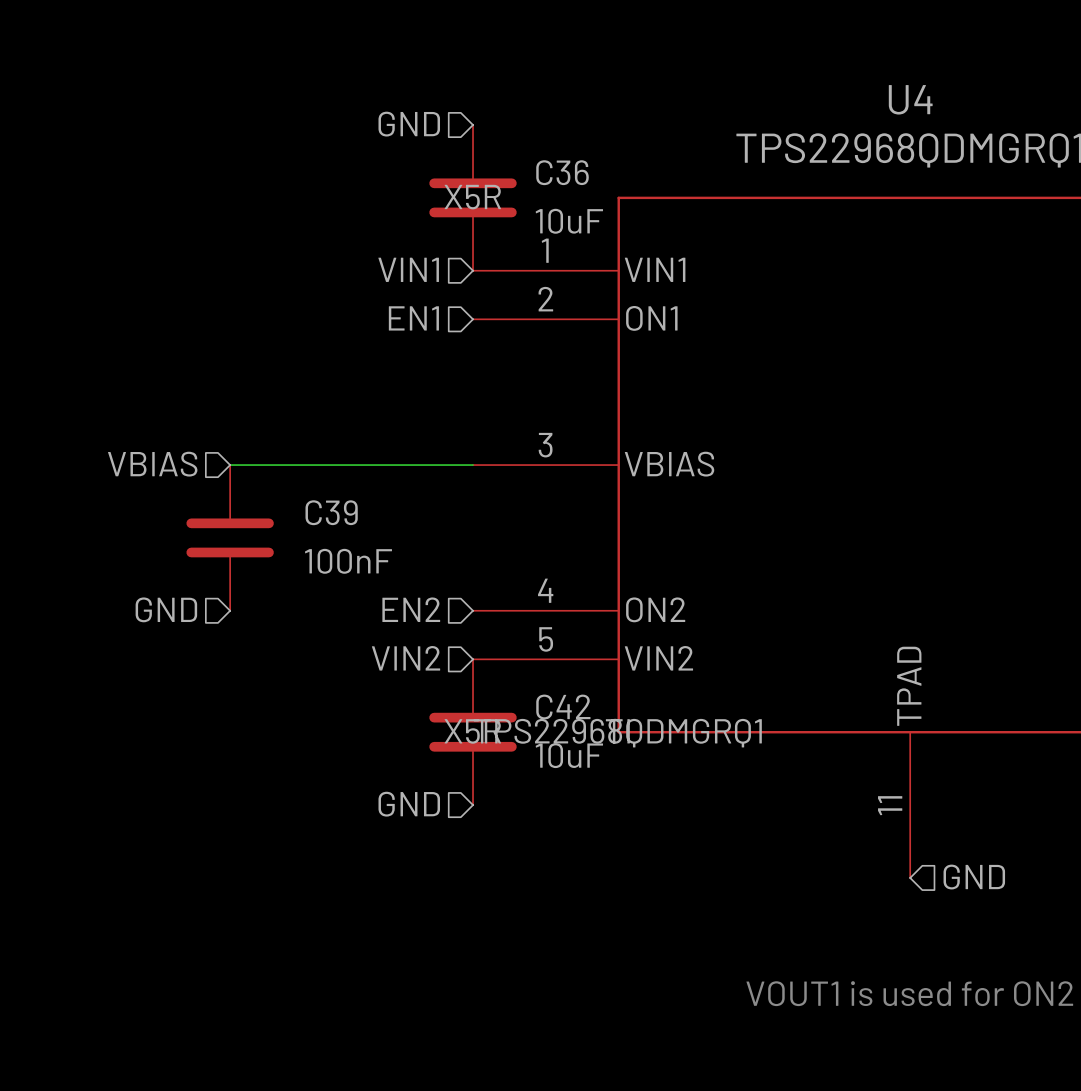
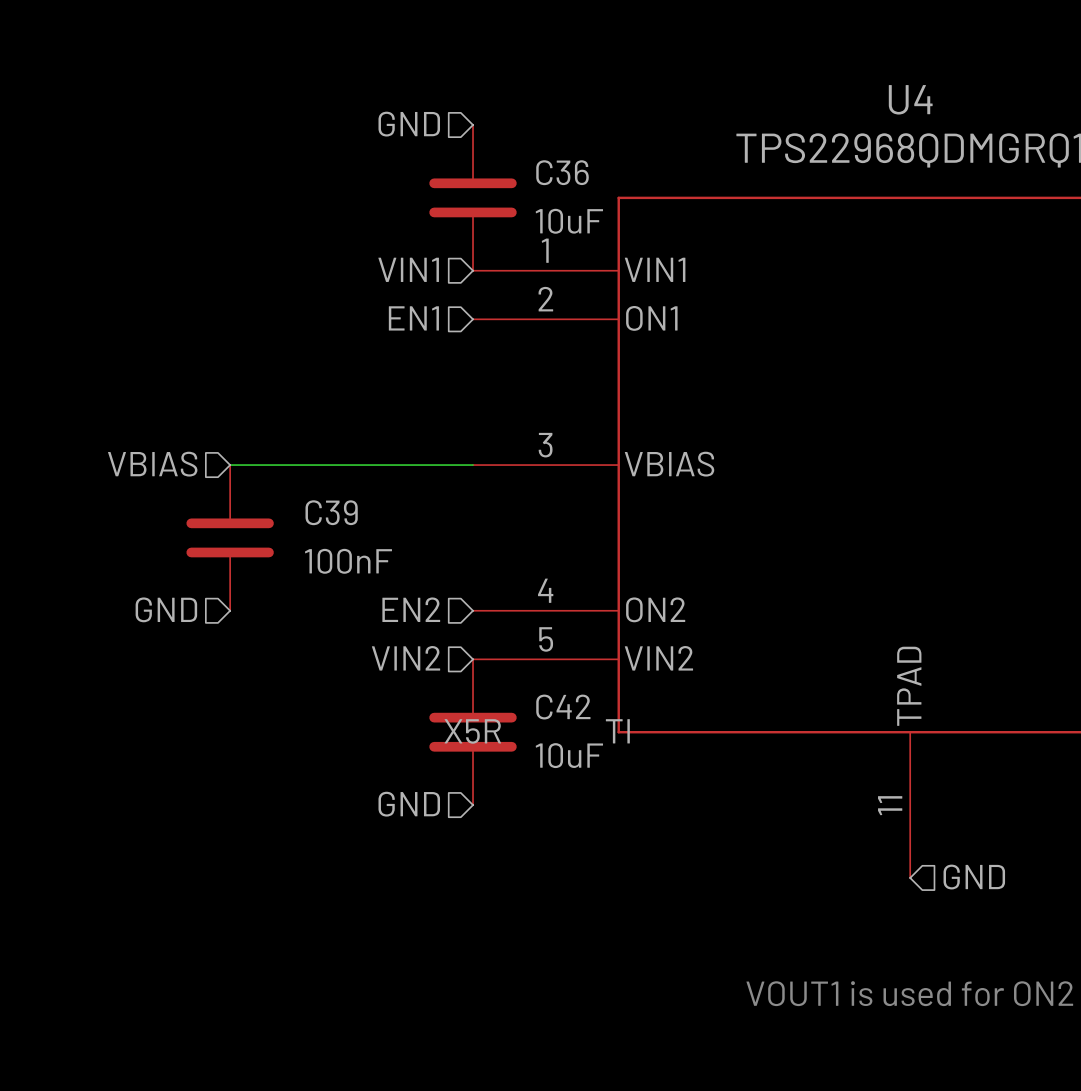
C36 text: X5R (472, 197) -> none
U4 text: TPS22968QDMGRQ1 (617, 733) -> none

